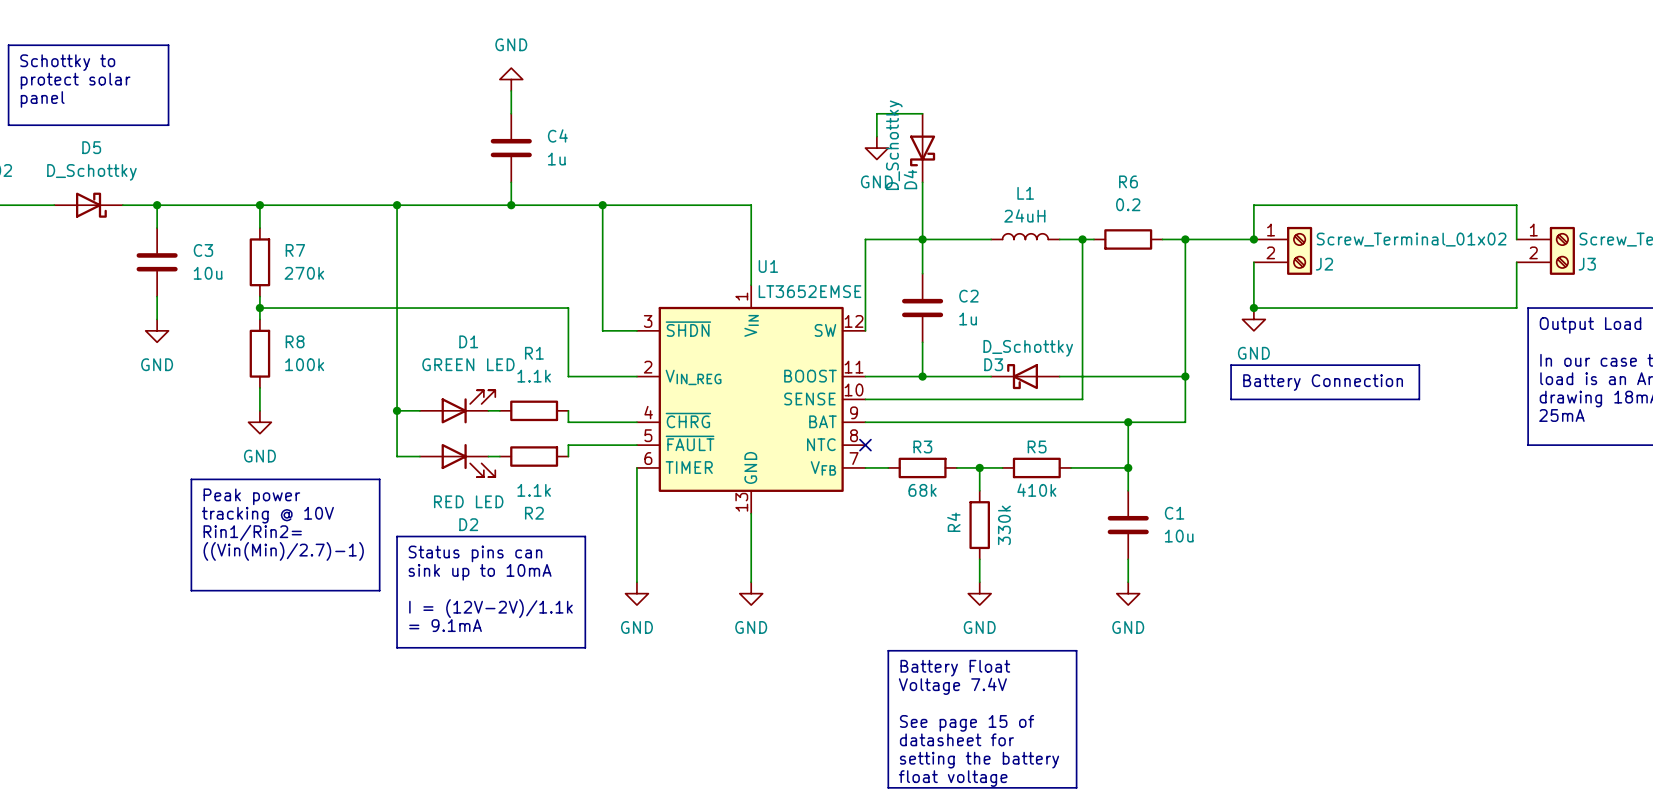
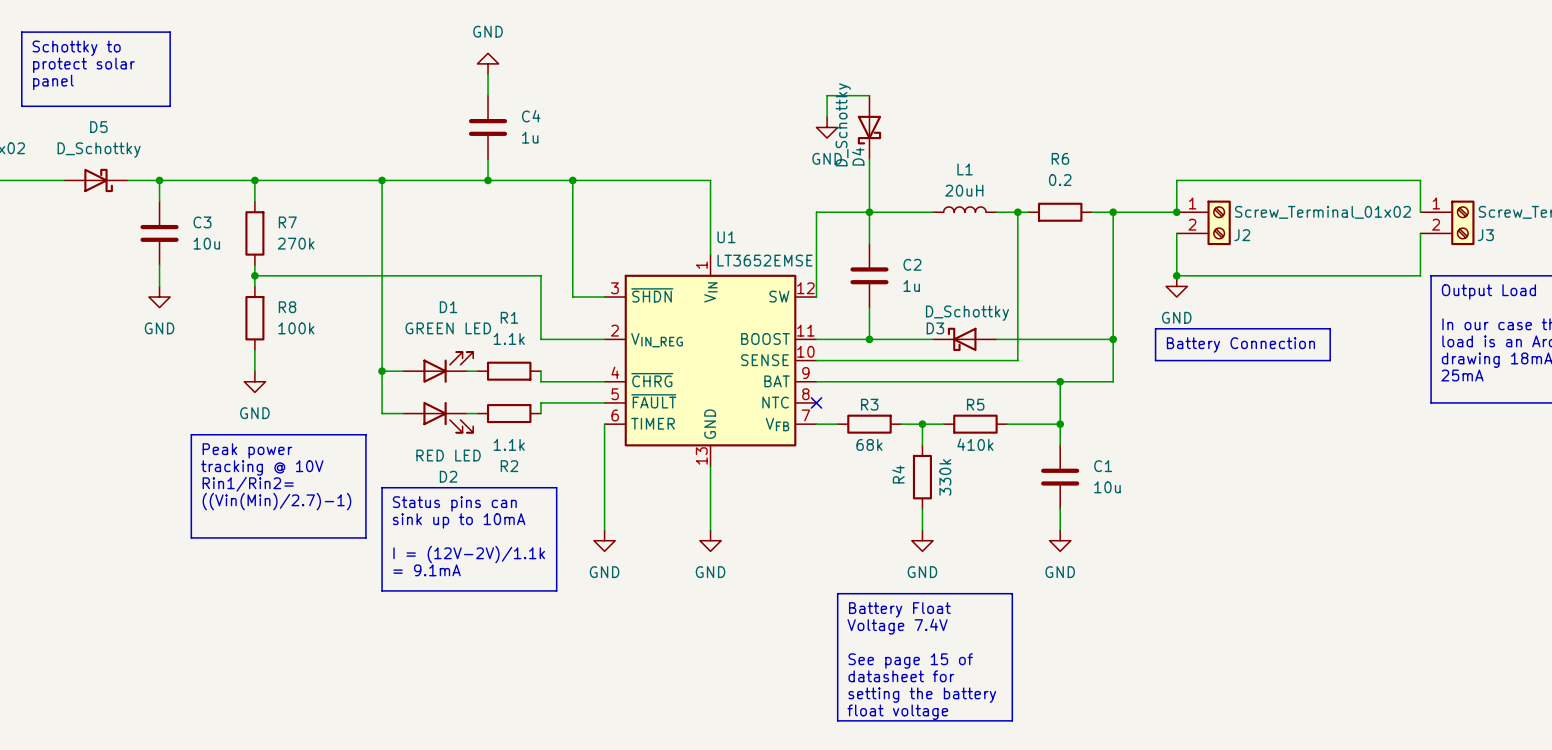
L1 value: 24uH (1024, 215) -> 20uH (964, 190)

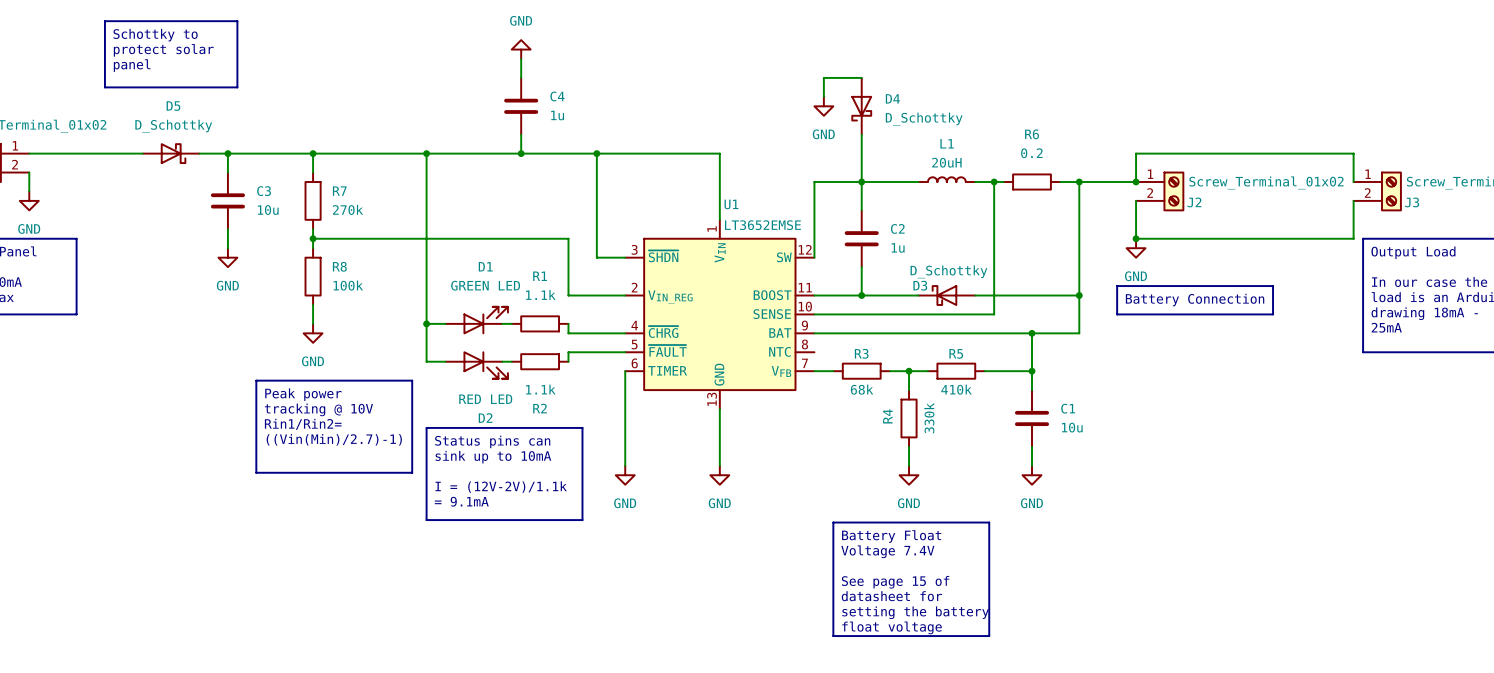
D4 value rotation: 0° (843, 124) -> 90° clockwise (924, 119)
D4 value position: D_Schottky (843, 124) -> D_Schottky (924, 119)
D4 name rotation: 0° (858, 156) -> 90° clockwise (892, 98)
D4 name position: D4 (858, 156) -> D4 (892, 98)
no-connect mark: (816, 402) -> none

